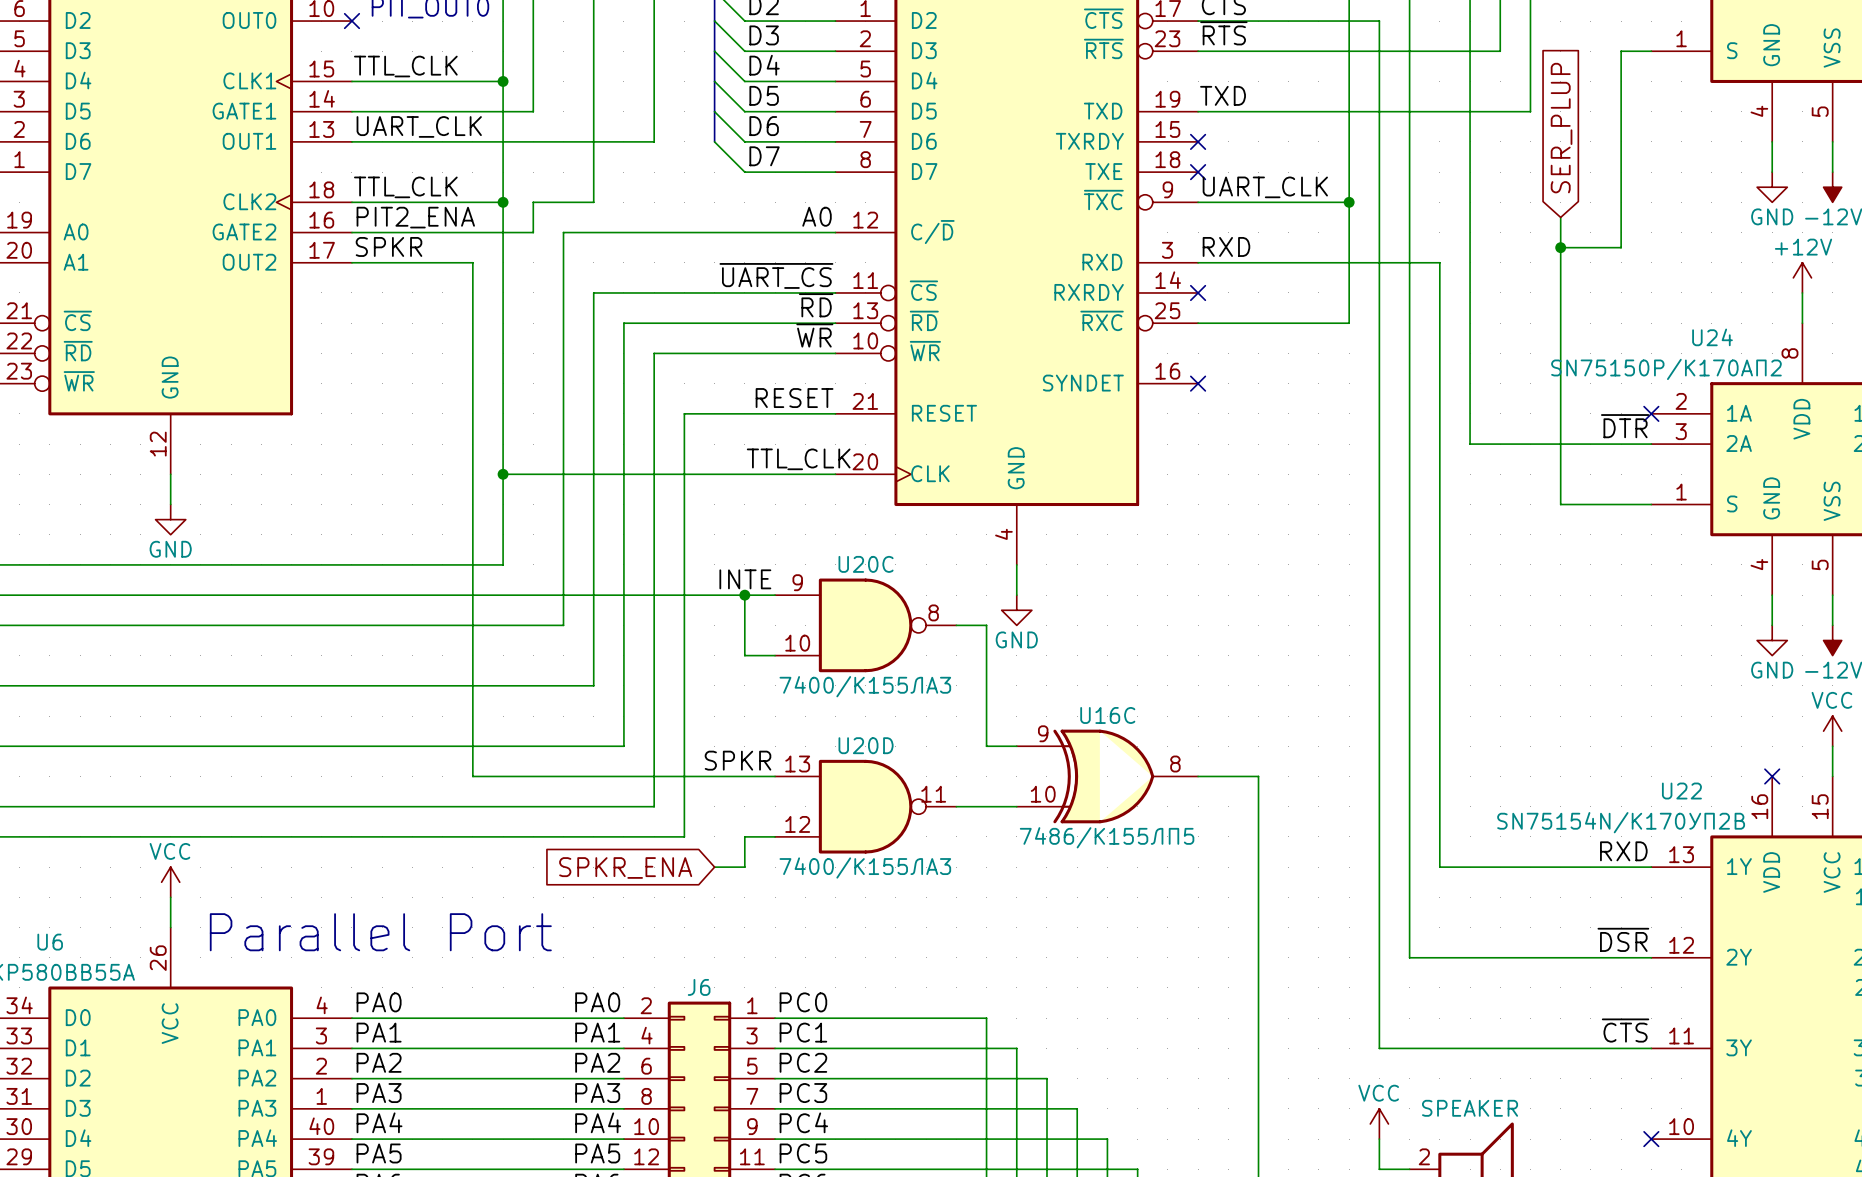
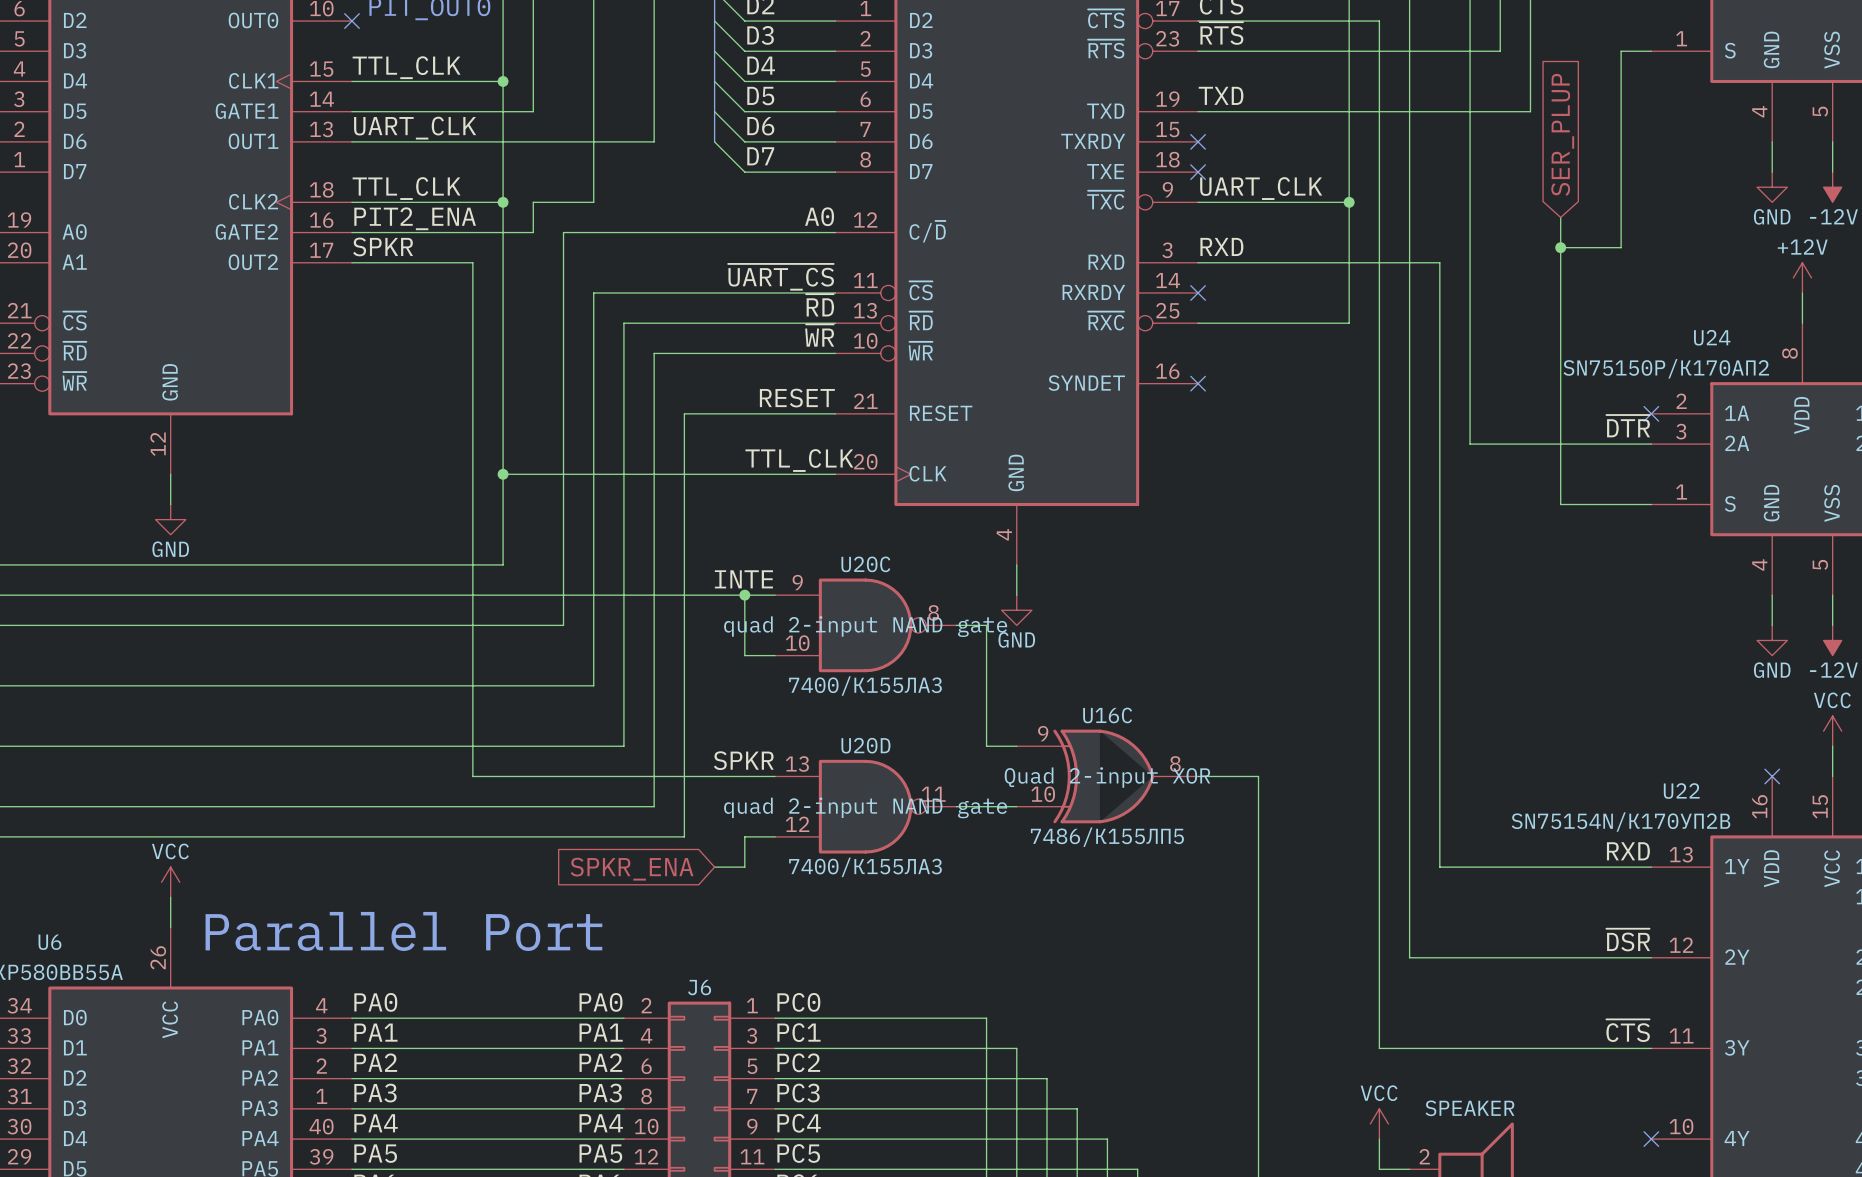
U20C text: none -> quad 2-input NAND gate (865, 626)
U16C text: none -> Quad 2-input XOR (1107, 777)
U20D text: none -> quad 2-input NAND gate (865, 807)

